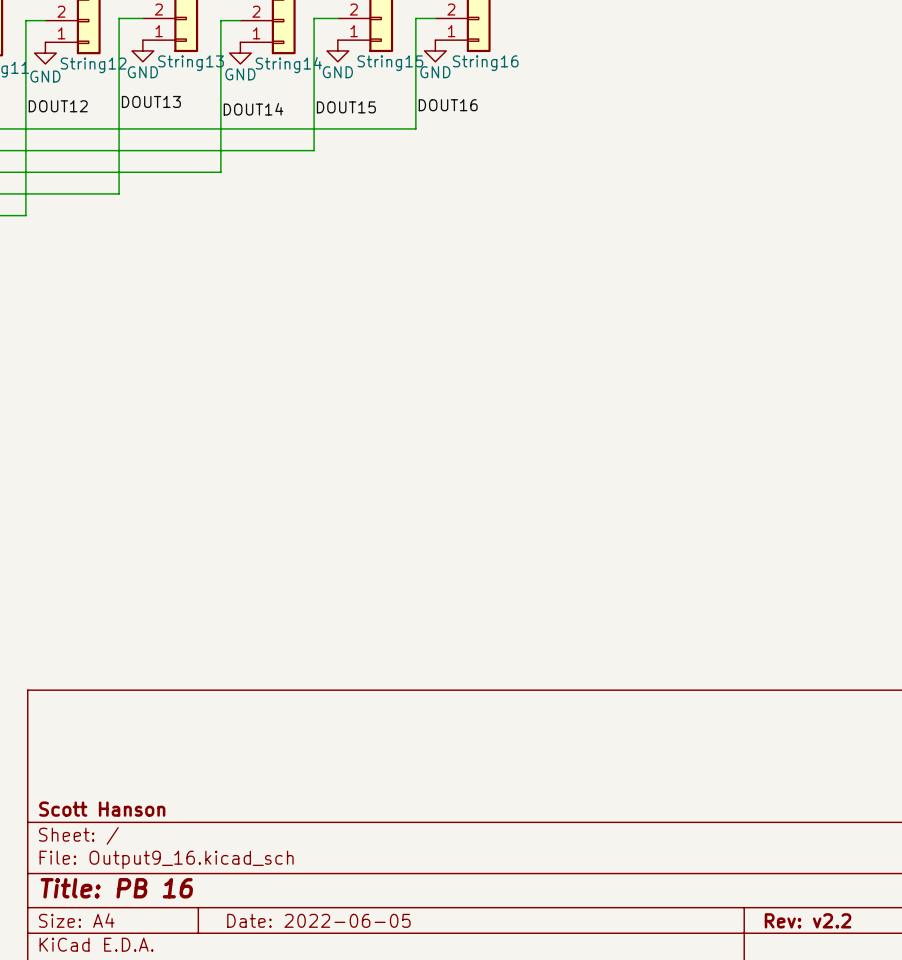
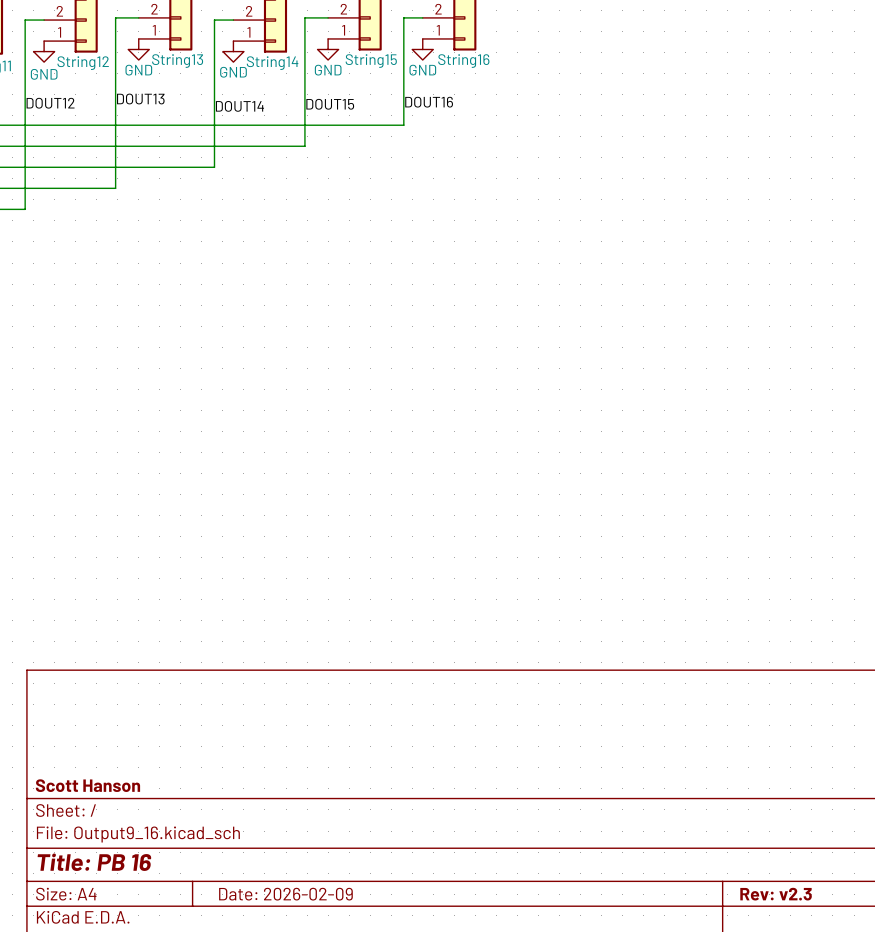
title block: Date: 2022-06-05 (318, 920) -> Date: 2026-02-09 (285, 894)
title block: Rev: v2.2 (808, 920) -> Rev: v2.3 (776, 894)

